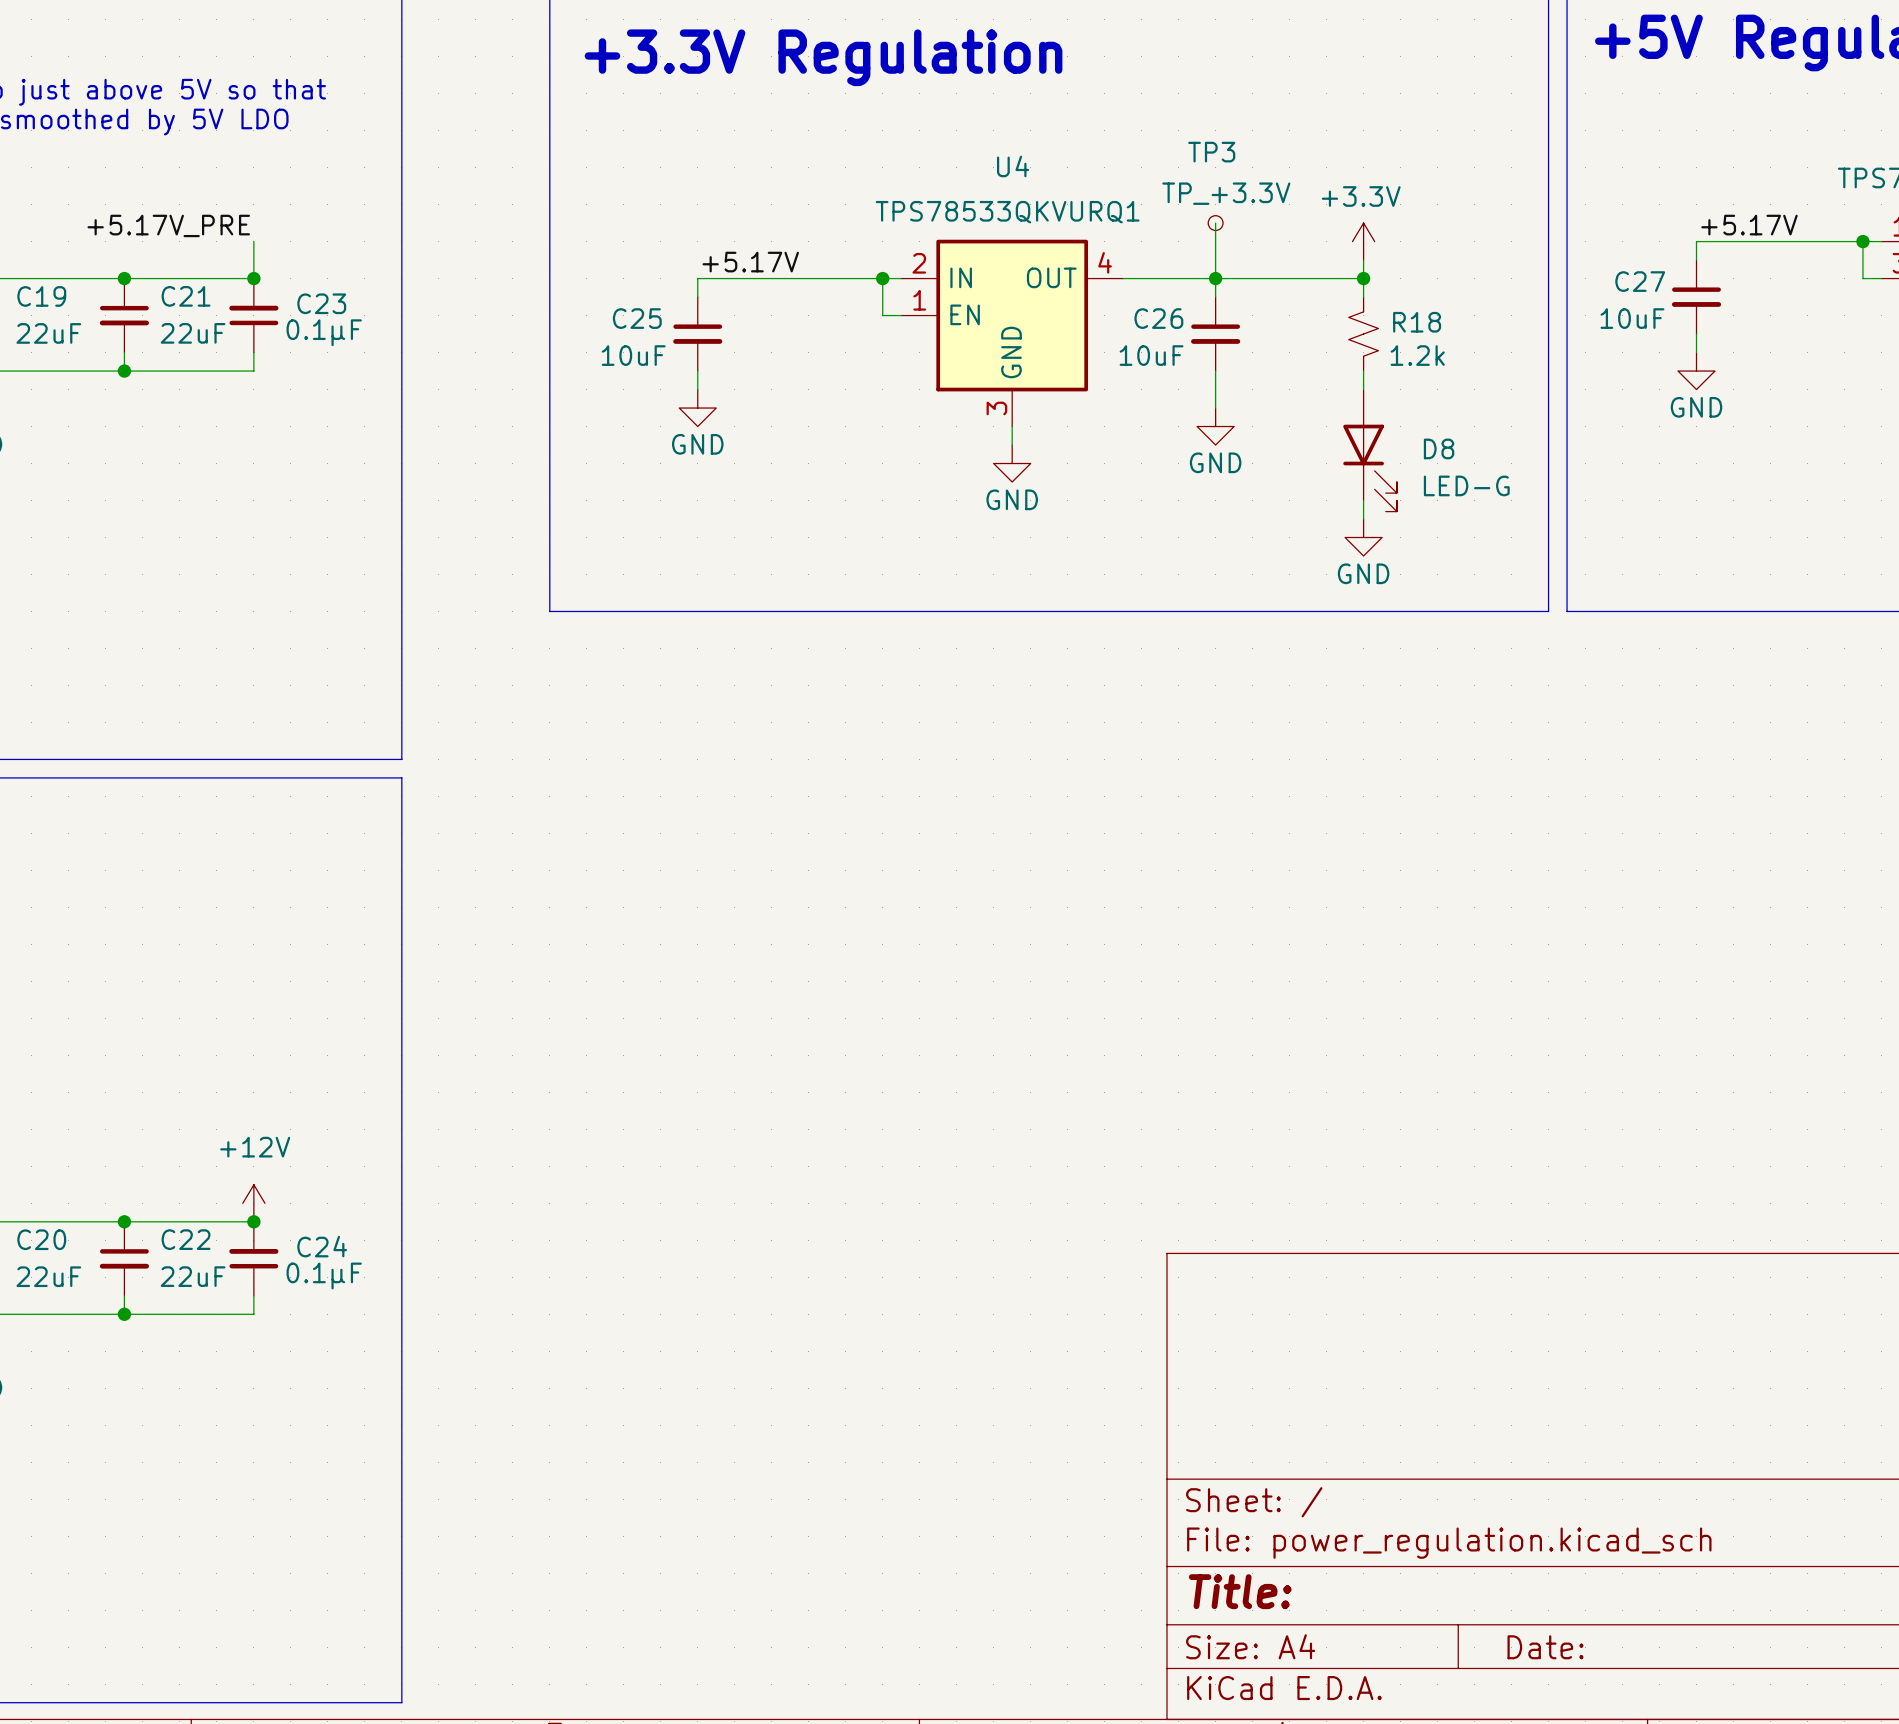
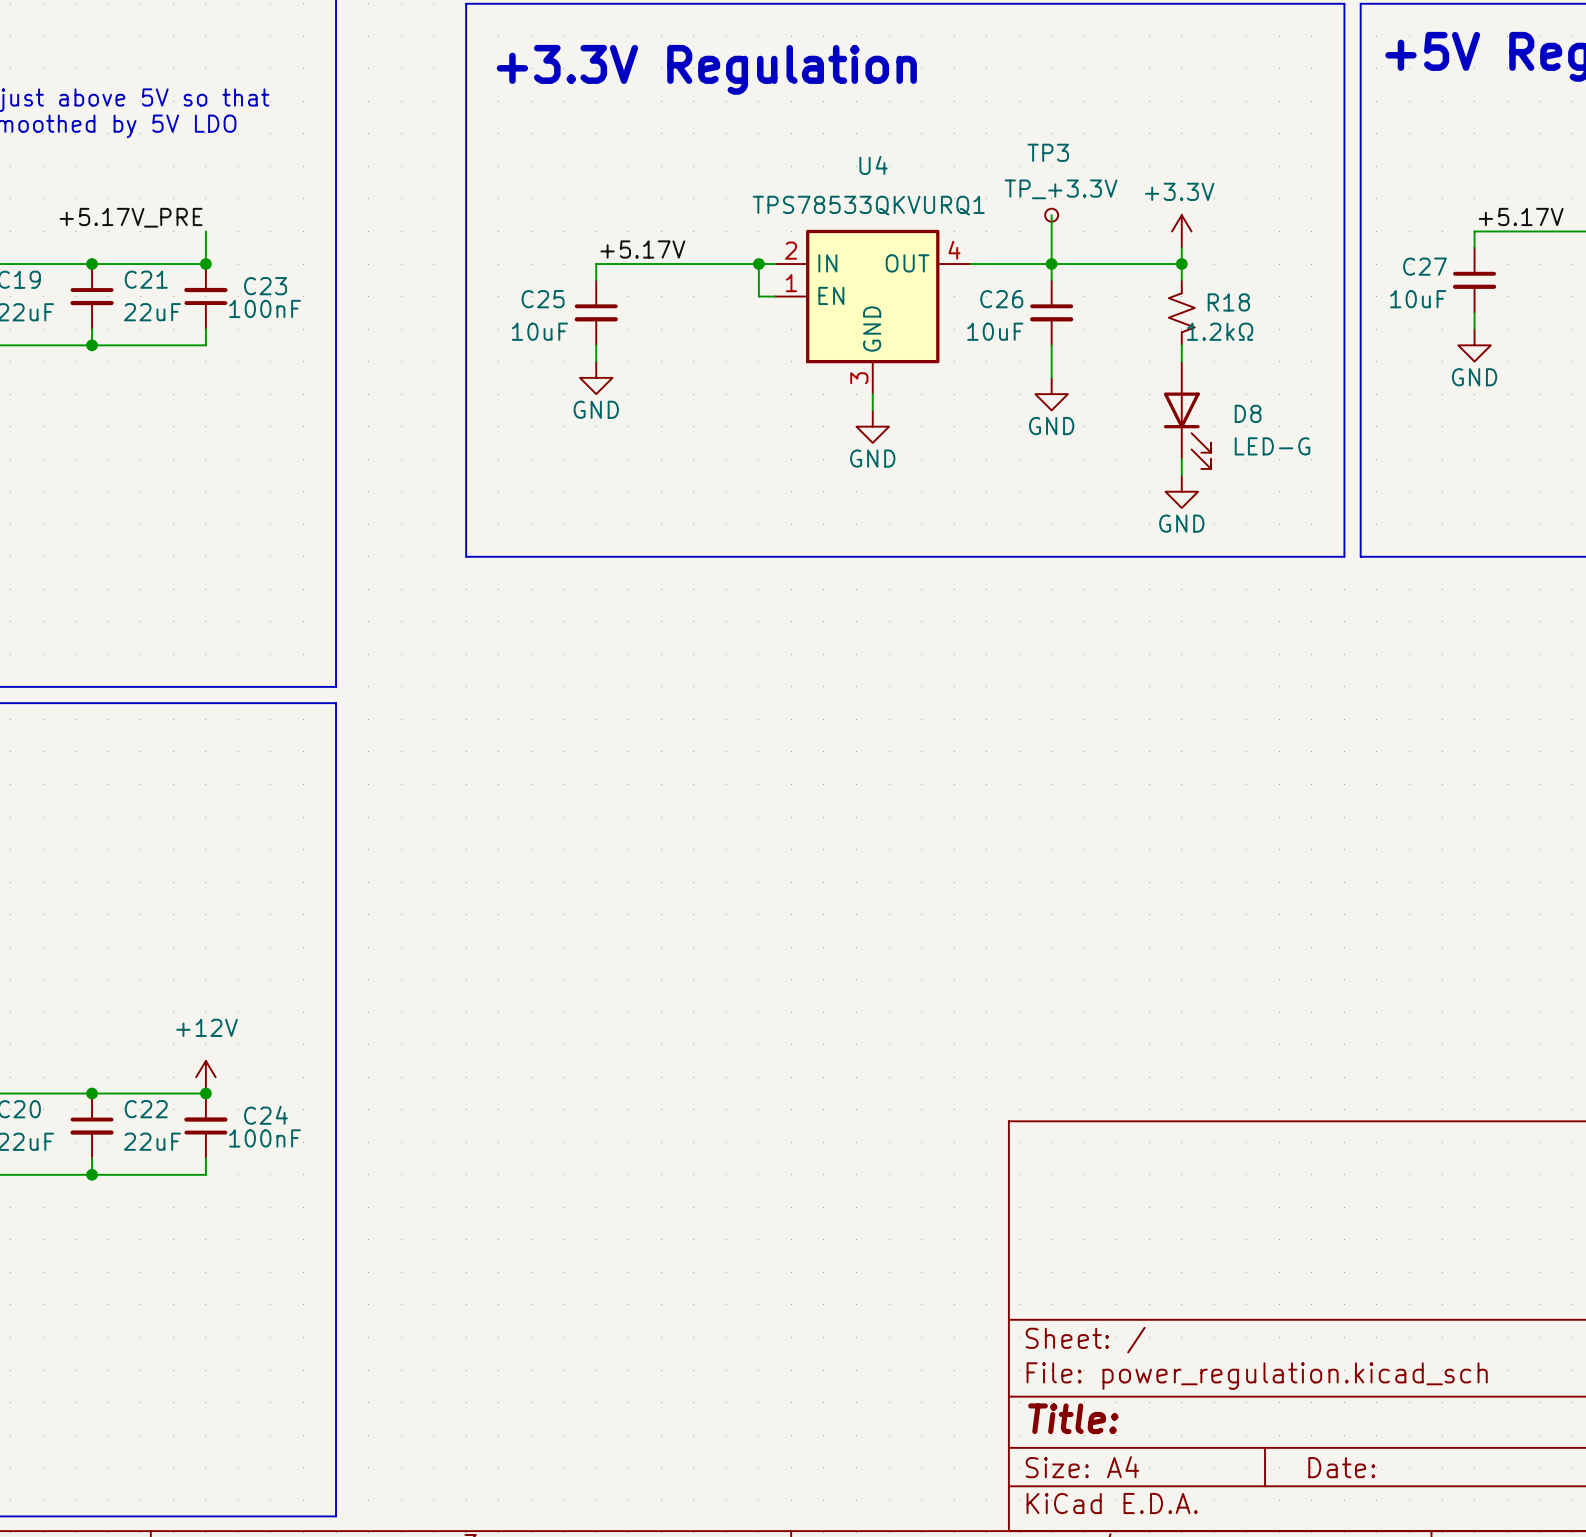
C23 value: 0.1μF (324, 332) -> 100nF (265, 308)
R18 value: 1.2k (1417, 355) -> 1.2kΩ (1220, 331)
C24 value: 0.1μF (324, 1276) -> 100nF (265, 1138)

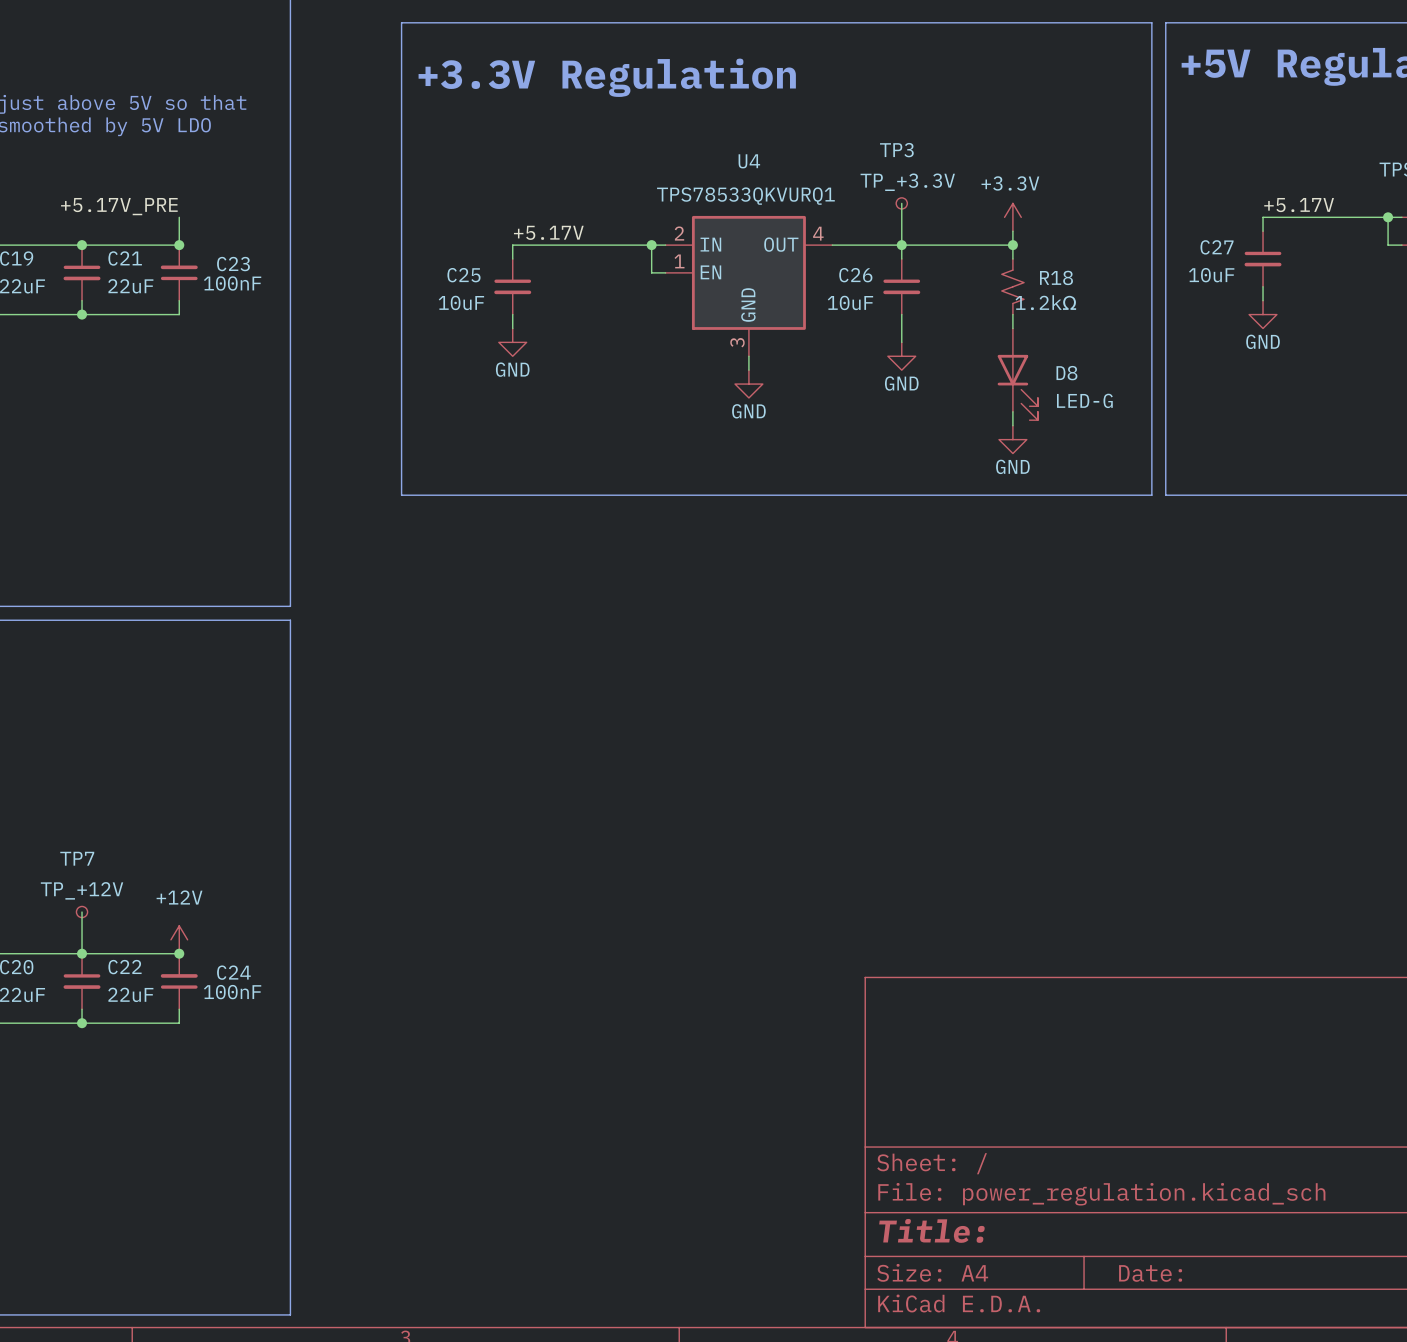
wire: none -> (82, 912) (82, 953)
TP7: none -> TP_+12V (82, 912)

